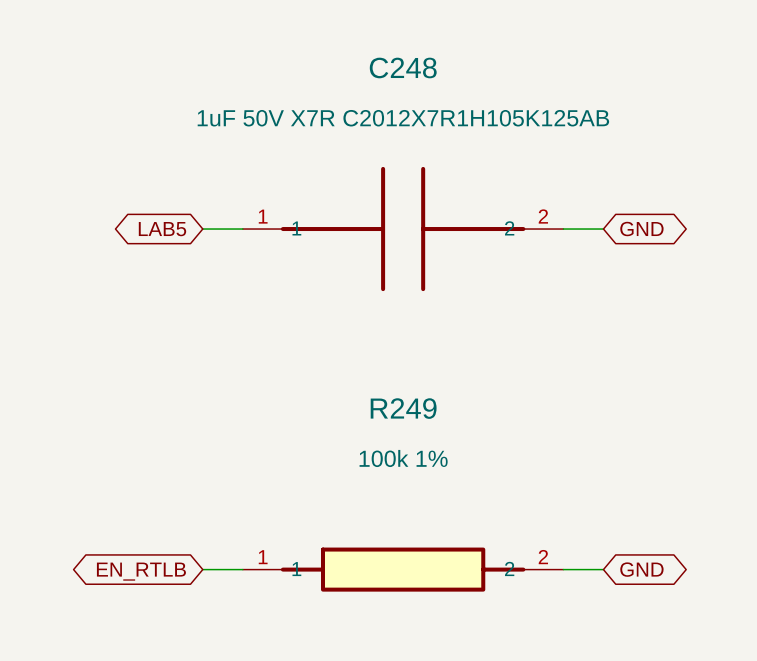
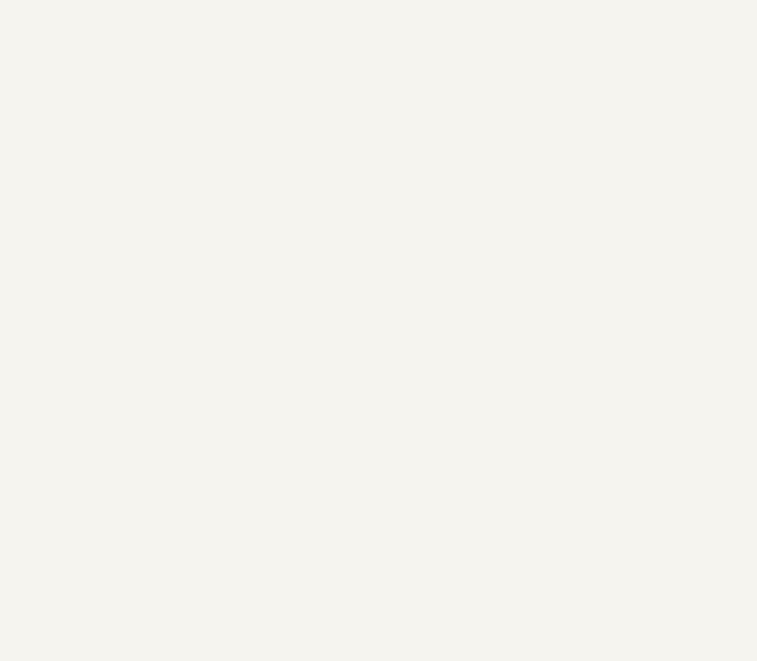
global label: LAB5 (162, 229) -> none
wire: (202, 229) (242, 229) -> none
C248: 1uF 50V X7R C2012X7R1H105K125AB (403, 229) -> none
wire: (563, 229) (603, 229) -> none
global label: GND (641, 229) -> none
wire: (202, 569) (242, 569) -> none
R249: 100k 1% (403, 569) -> none
wire: (563, 569) (603, 569) -> none
global label: GND (641, 569) -> none
global label: EN_RTLB (141, 571) -> none

